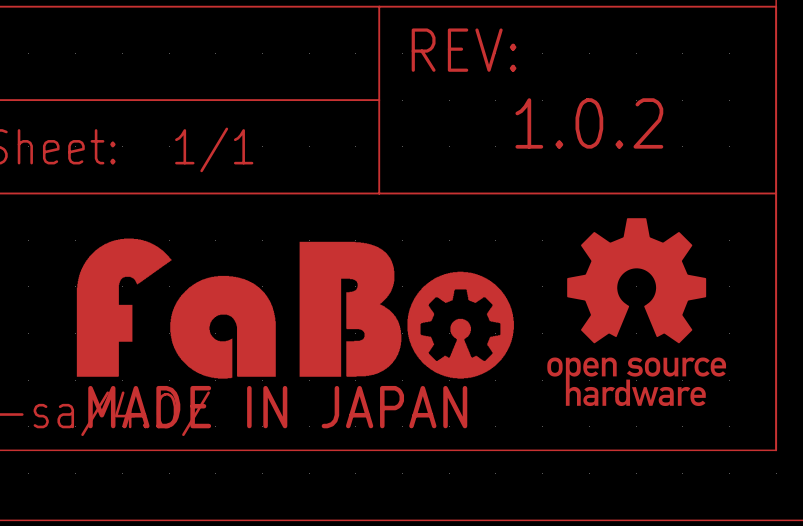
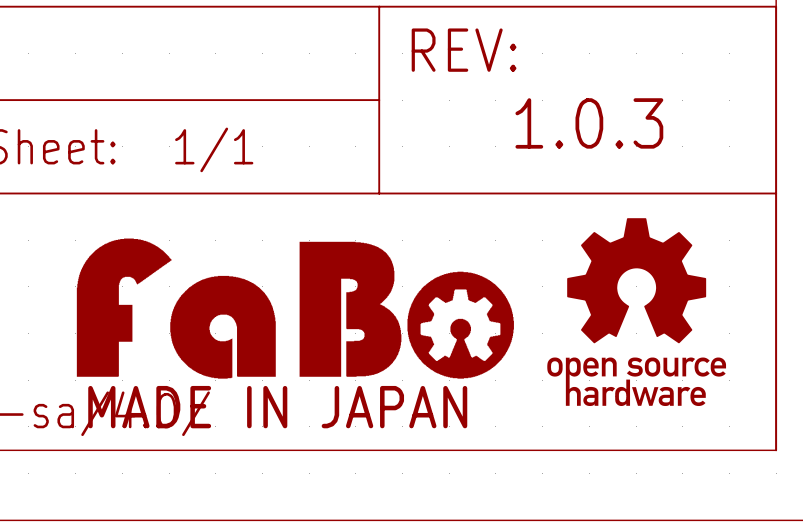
text: 1.0.2 (589, 123) -> 1.0.3 (589, 123)

